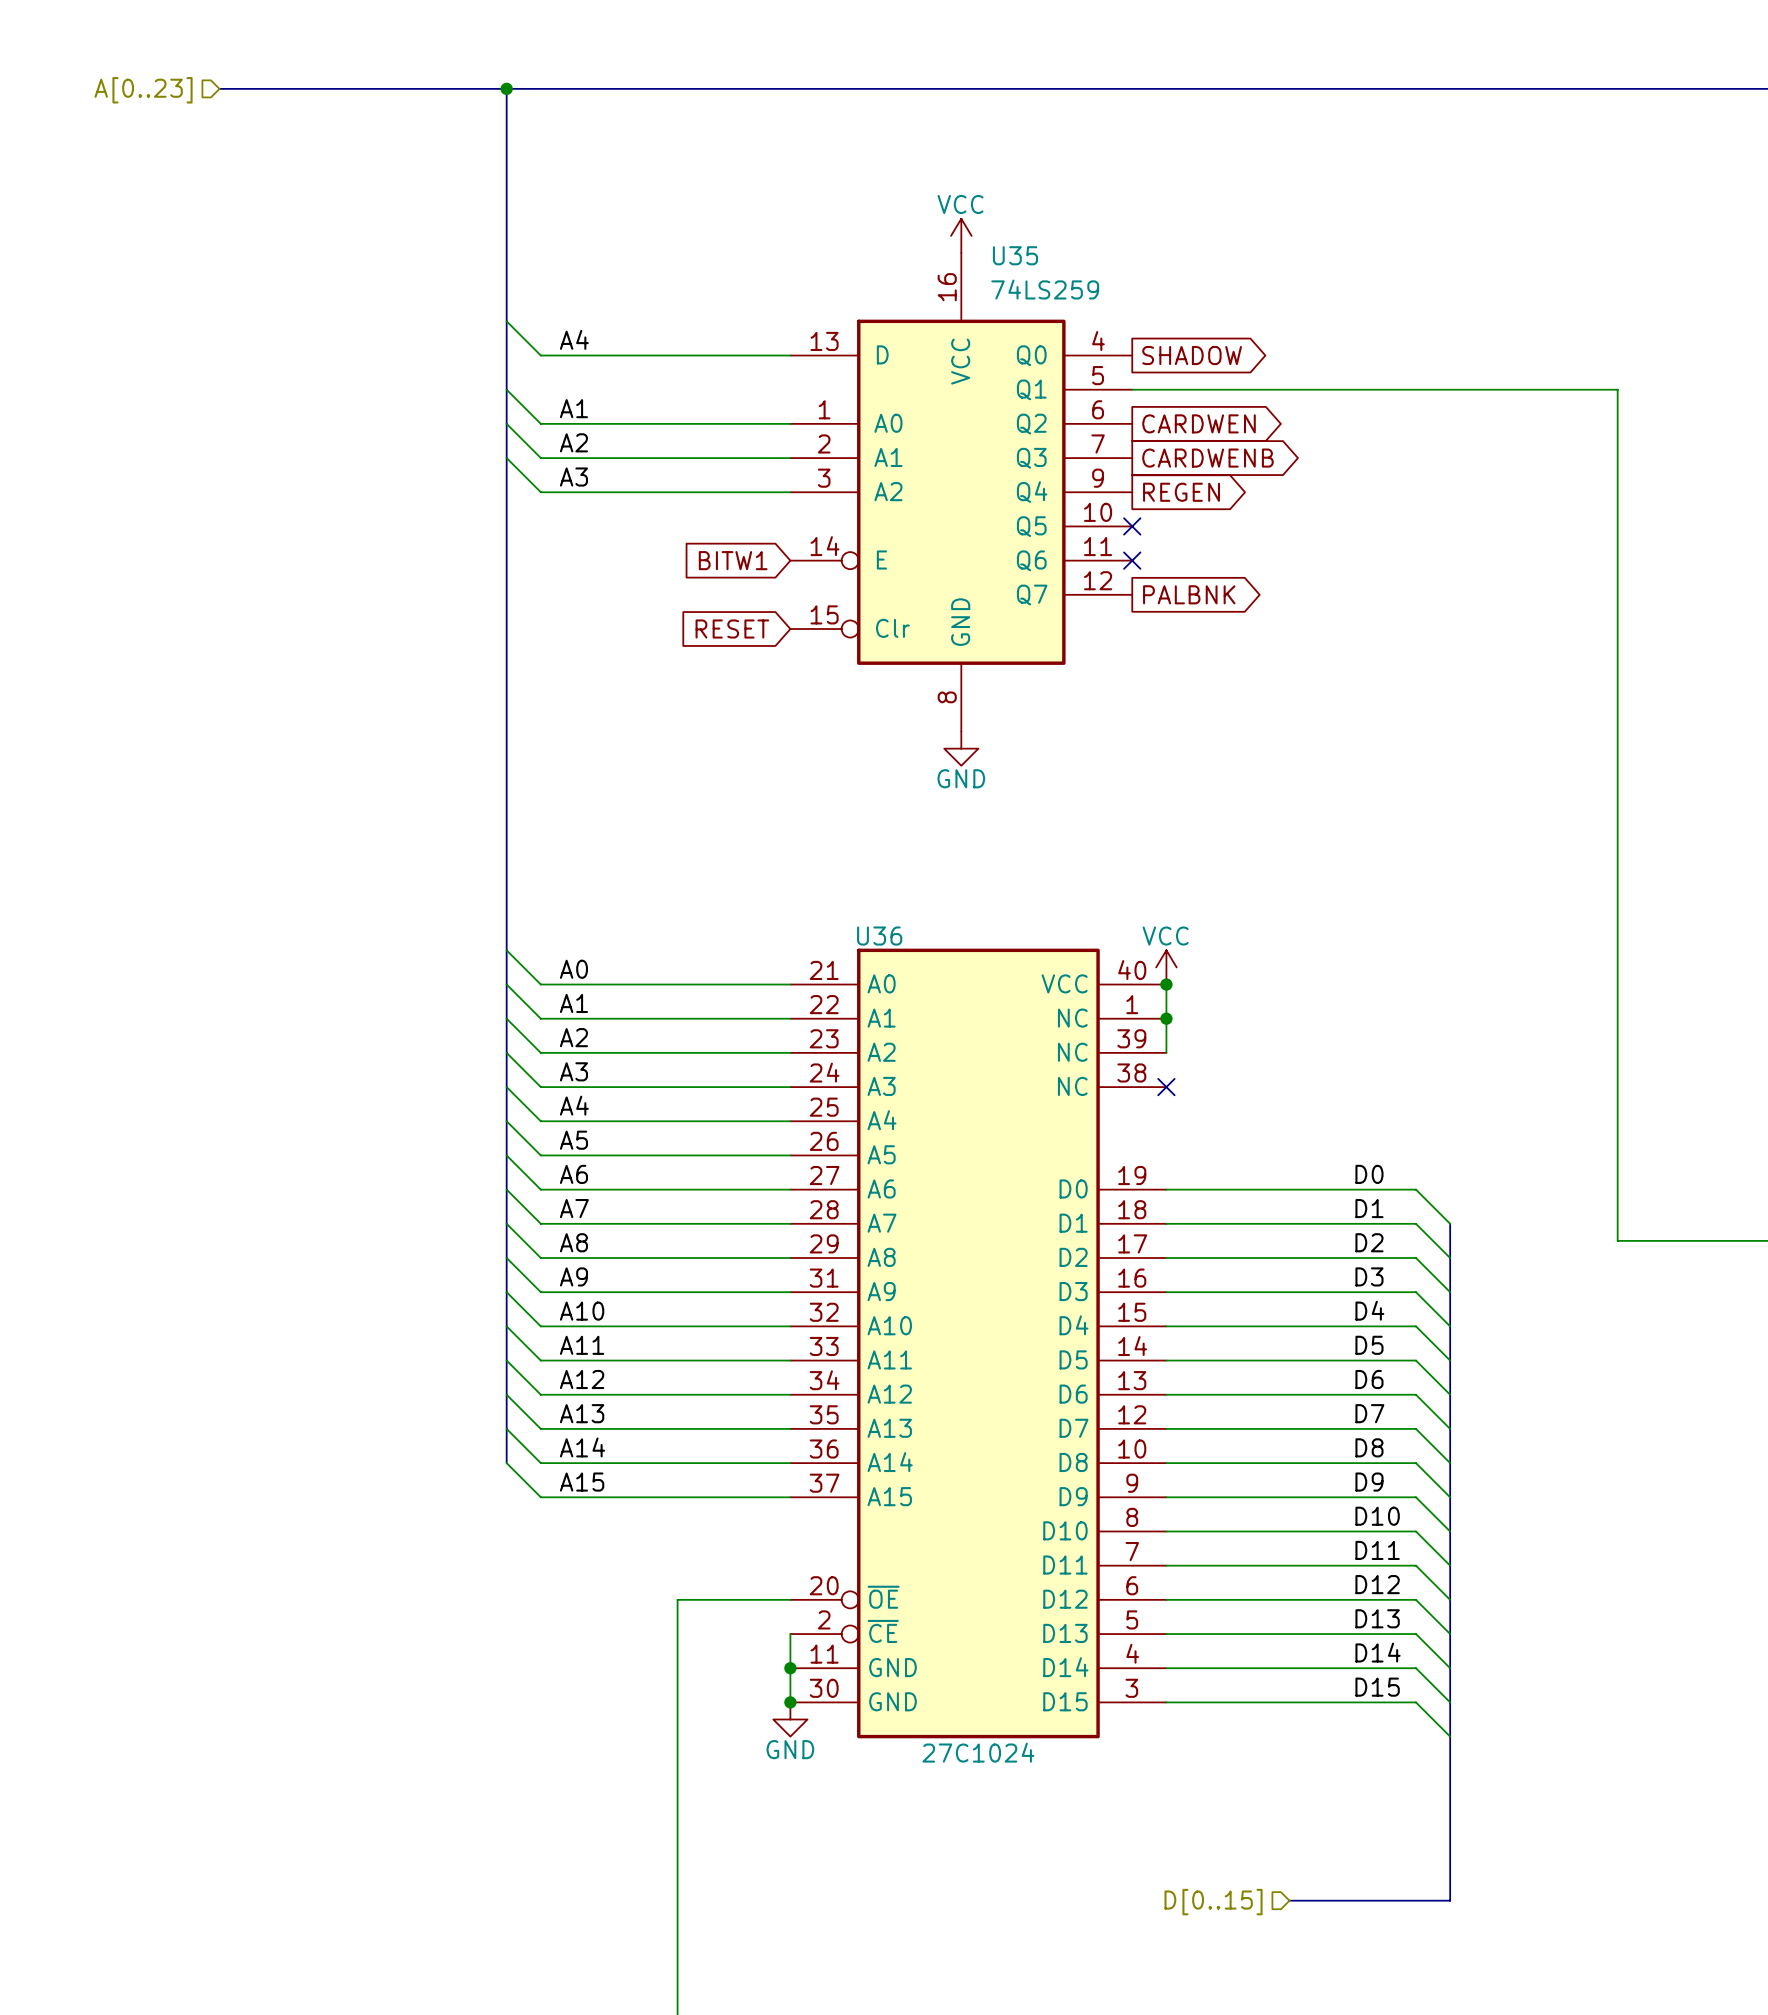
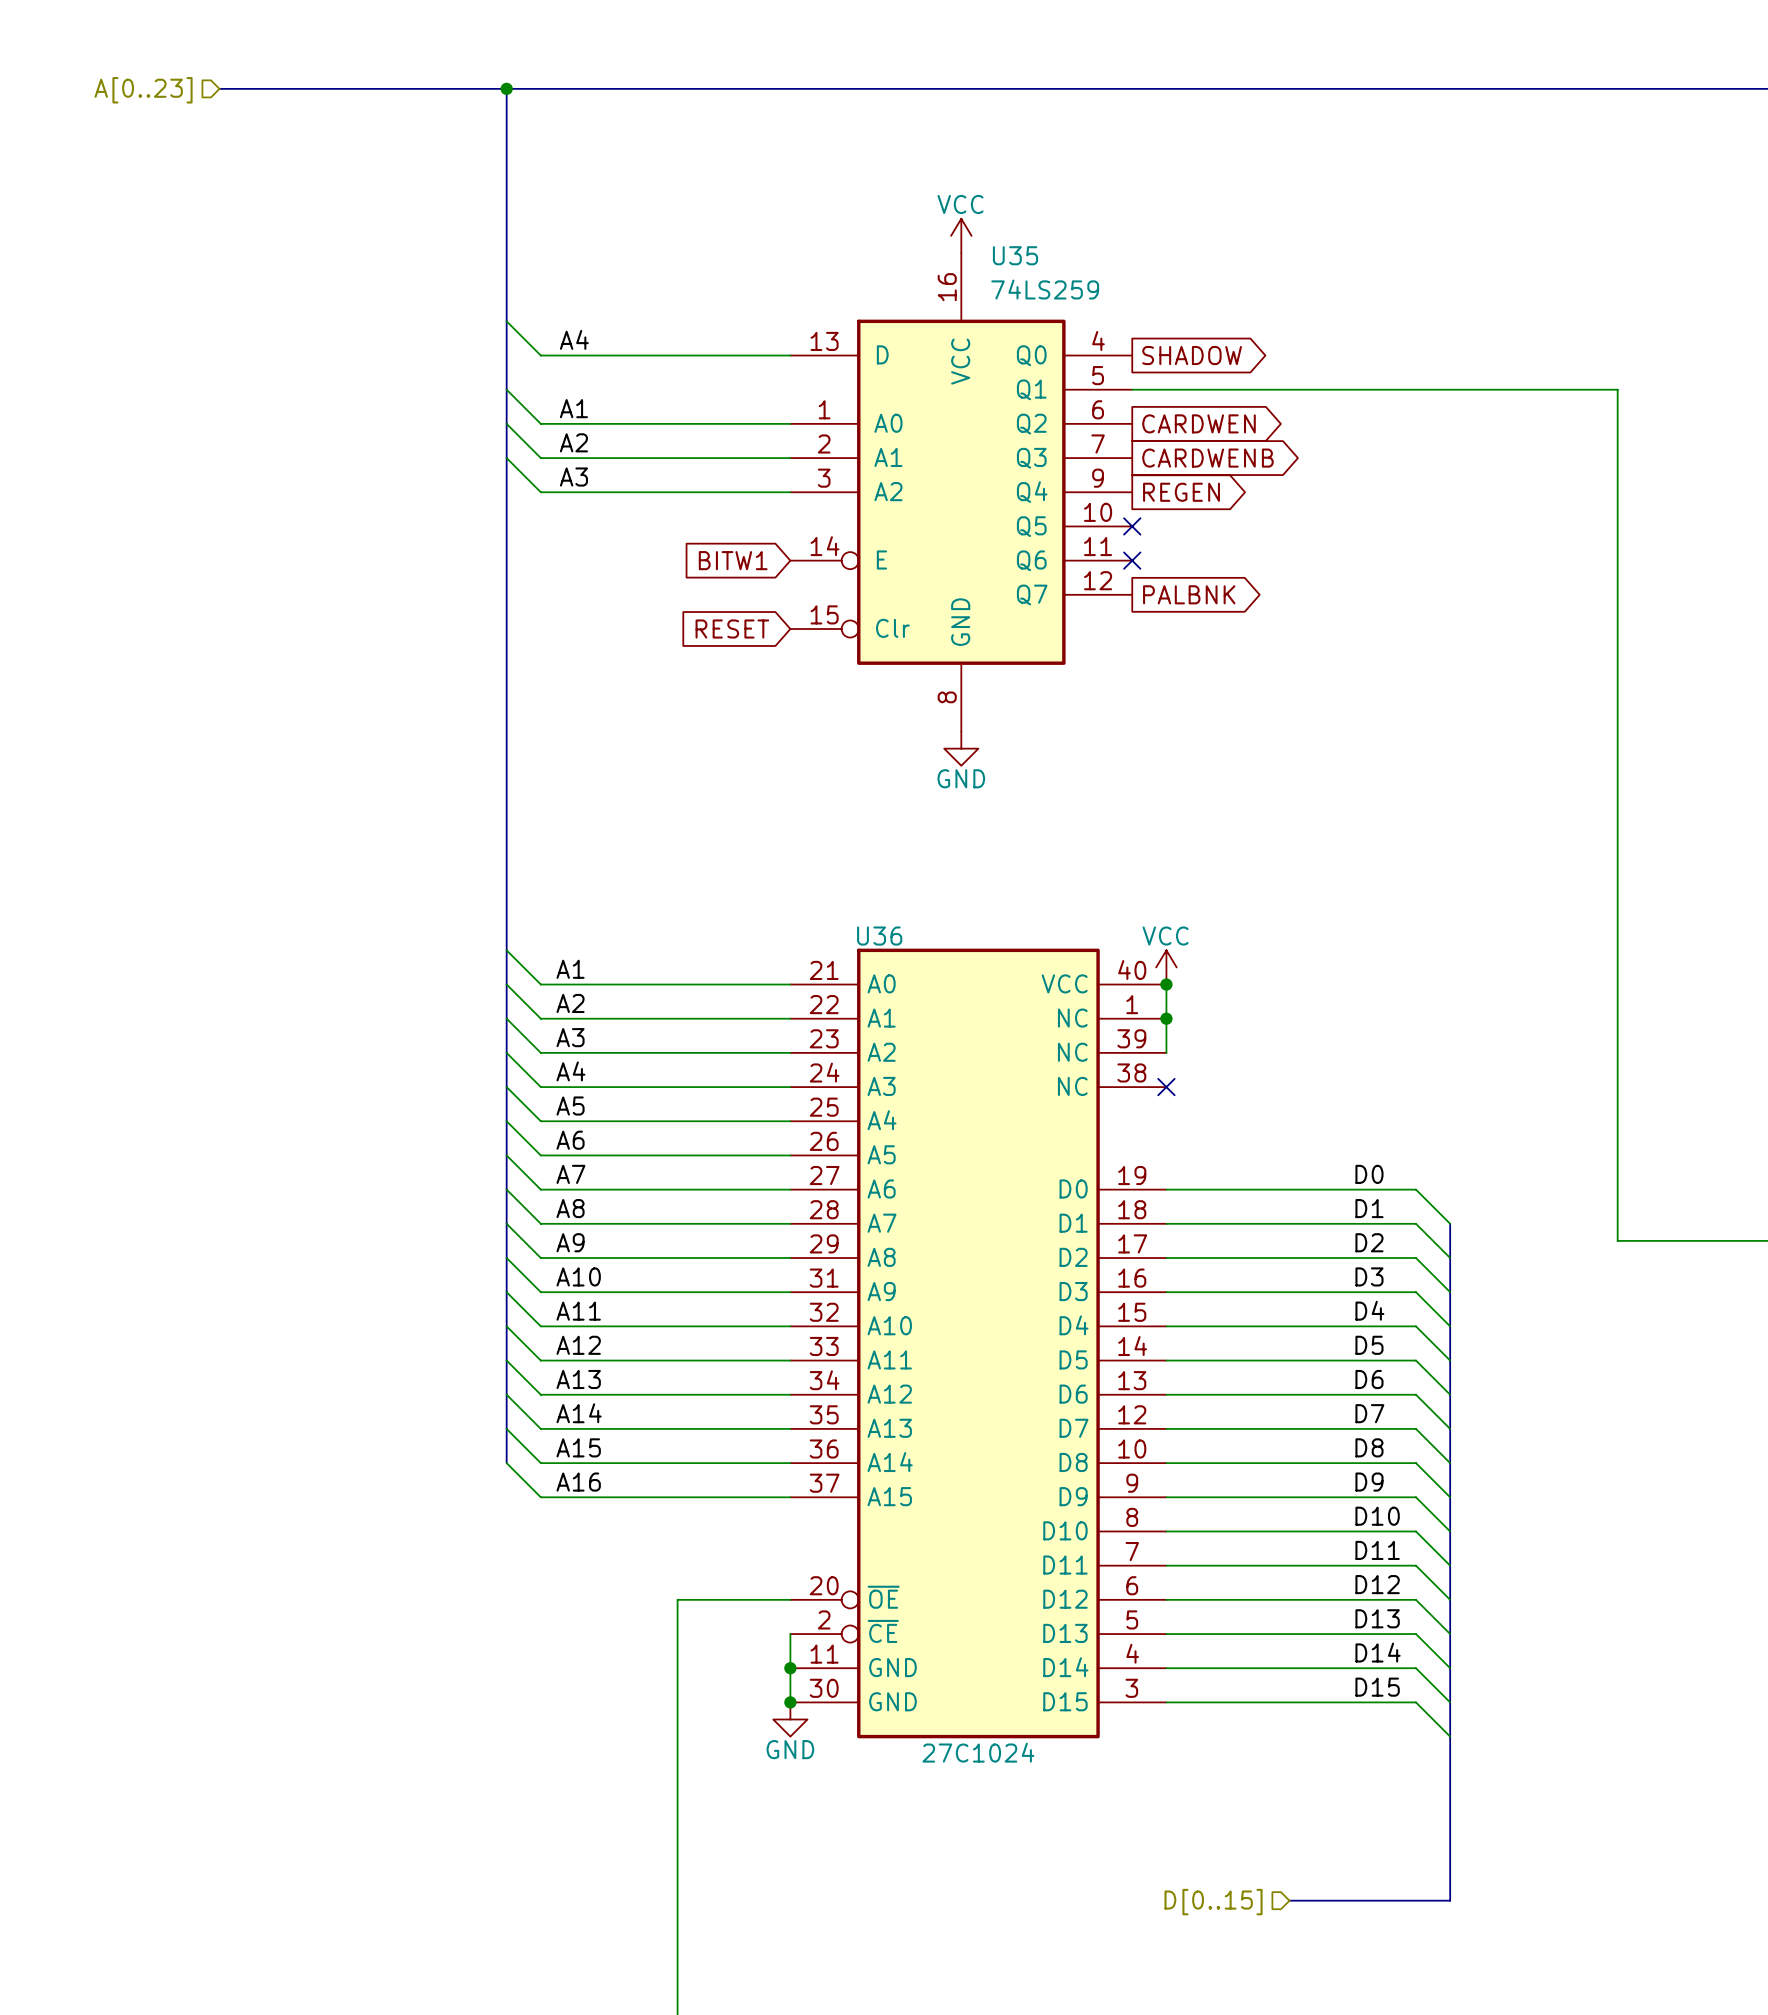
label: A0 (573, 969) -> none
label position: A1 (573, 1003) -> A1 (570, 969)
label position: A2 (573, 1037) -> A2 (570, 1003)
label position: A3 (573, 1071) -> A3 (570, 1037)
label position: A4 (574, 1105) -> A4 (570, 1071)
label position: A5 (573, 1140) -> A5 (570, 1106)
label position: A6 (573, 1174) -> A6 (570, 1140)
label position: A7 (574, 1208) -> A7 (570, 1174)
label position: A8 (573, 1242) -> A8 (570, 1208)
label position: A9 (573, 1276) -> A9 (570, 1242)
label position: A10 (582, 1311) -> A10 (578, 1276)
label position: A11 (582, 1345) -> A11 (578, 1311)
label position: A12 (582, 1379) -> A12 (578, 1345)
label position: A13 (582, 1413) -> A13 (578, 1379)
label position: A14 (582, 1447) -> A14 (579, 1413)
label: none -> A16 (578, 1482)
label position: A15 (582, 1482) -> A15 (578, 1447)

